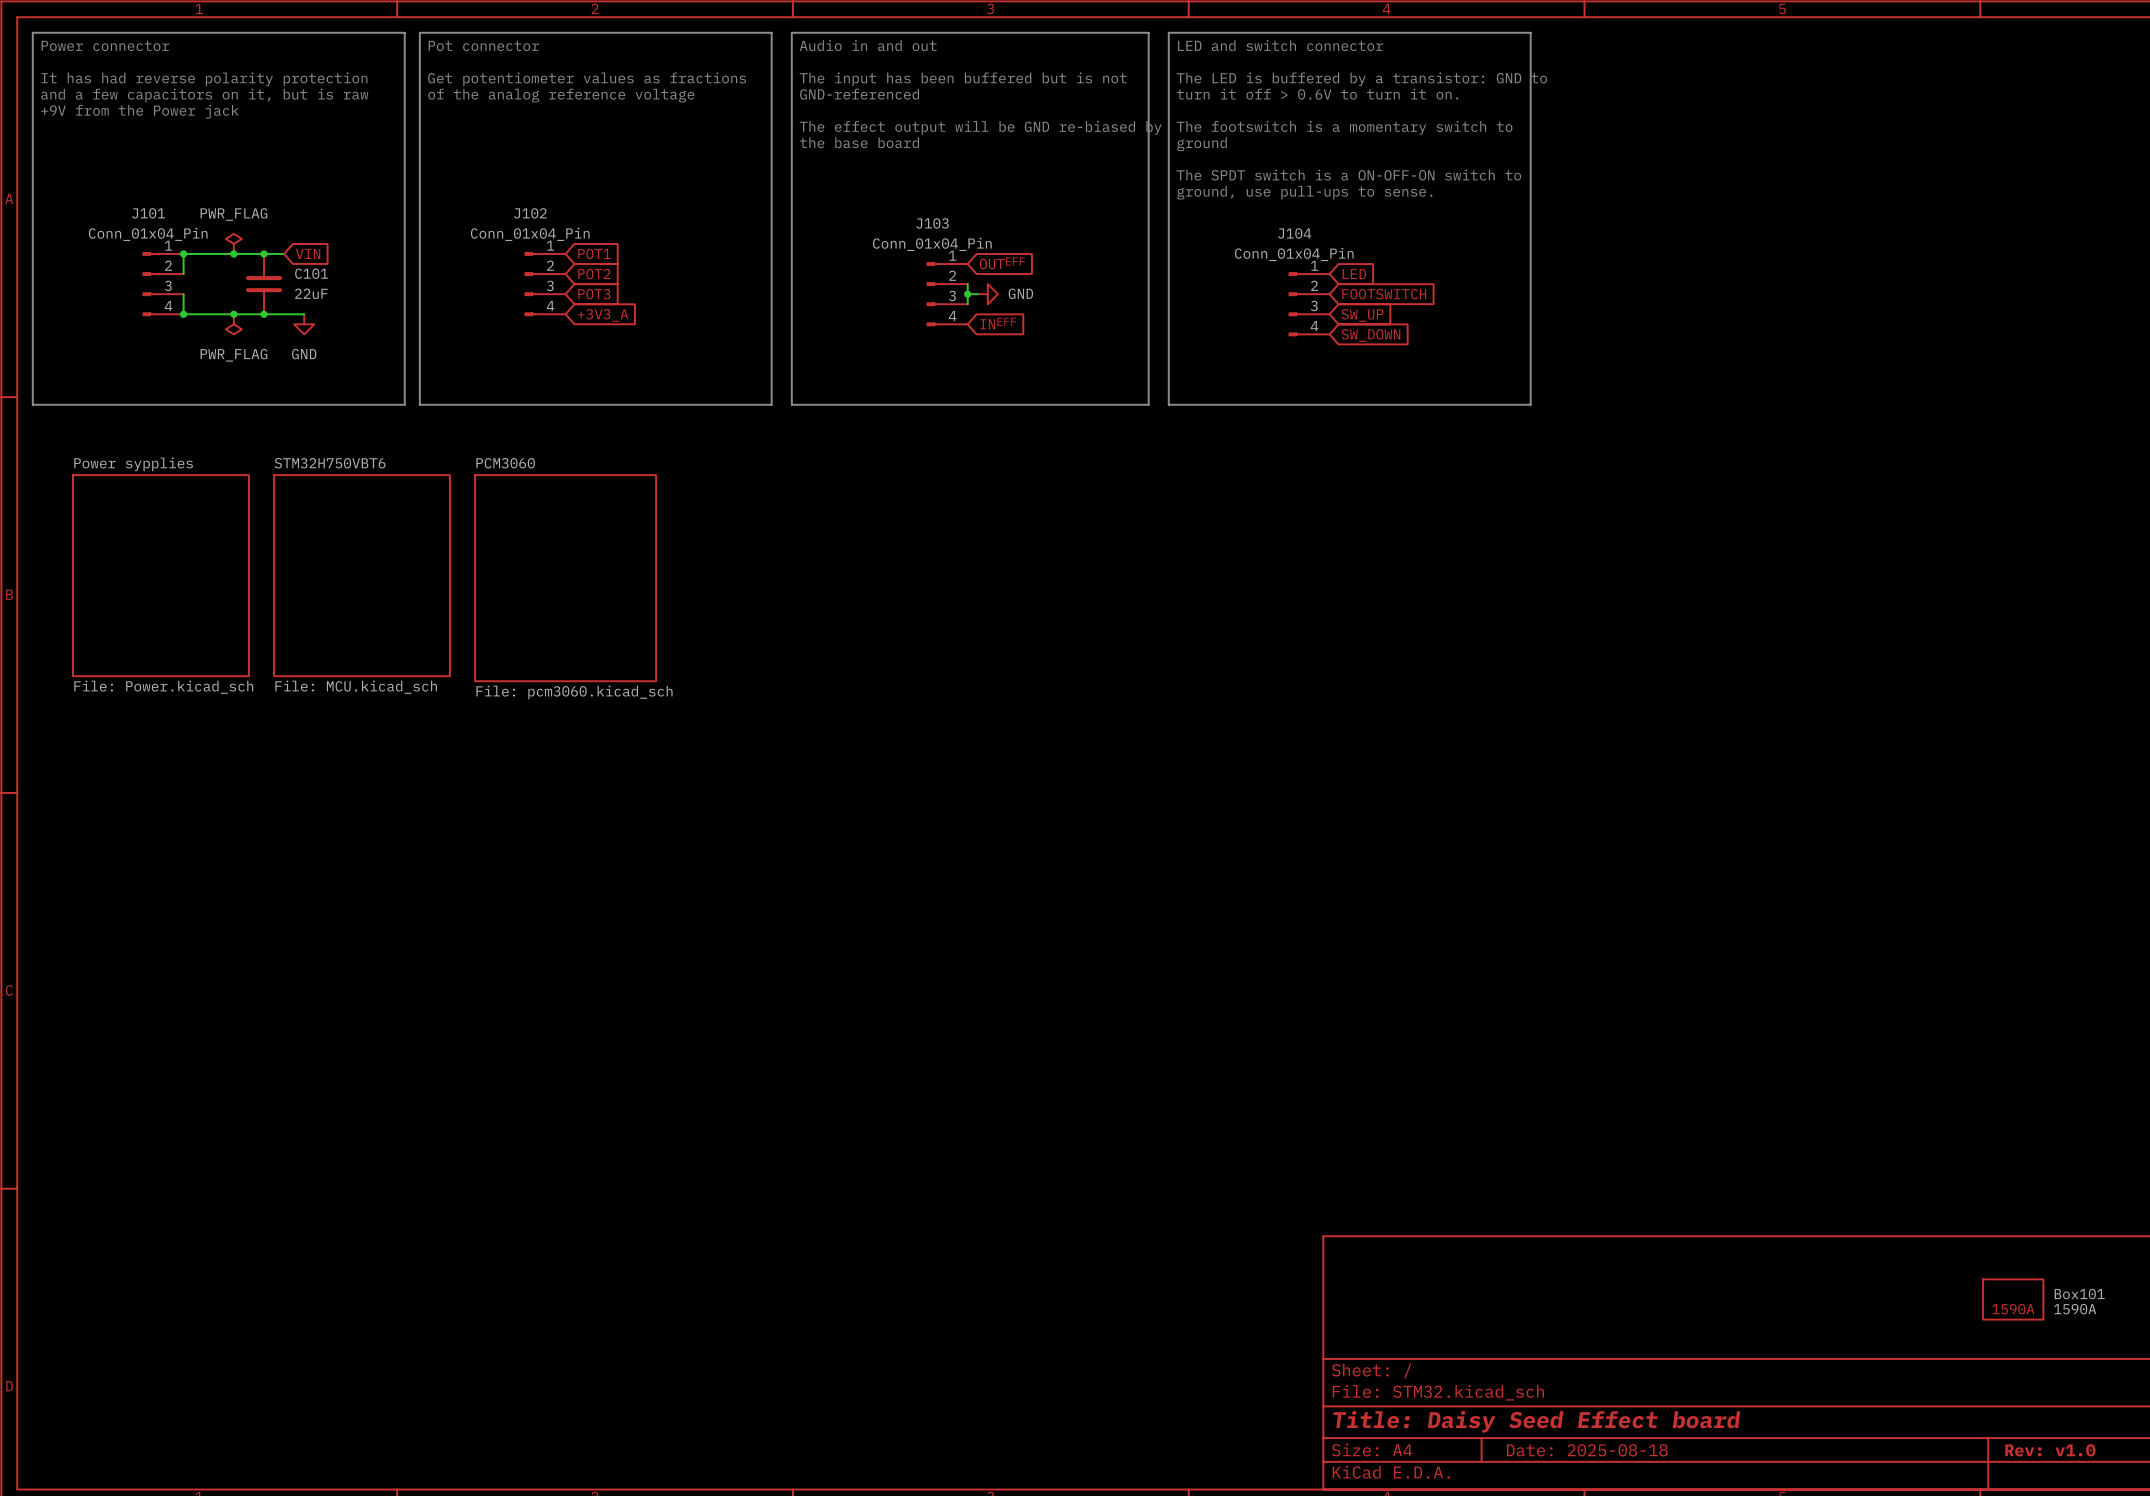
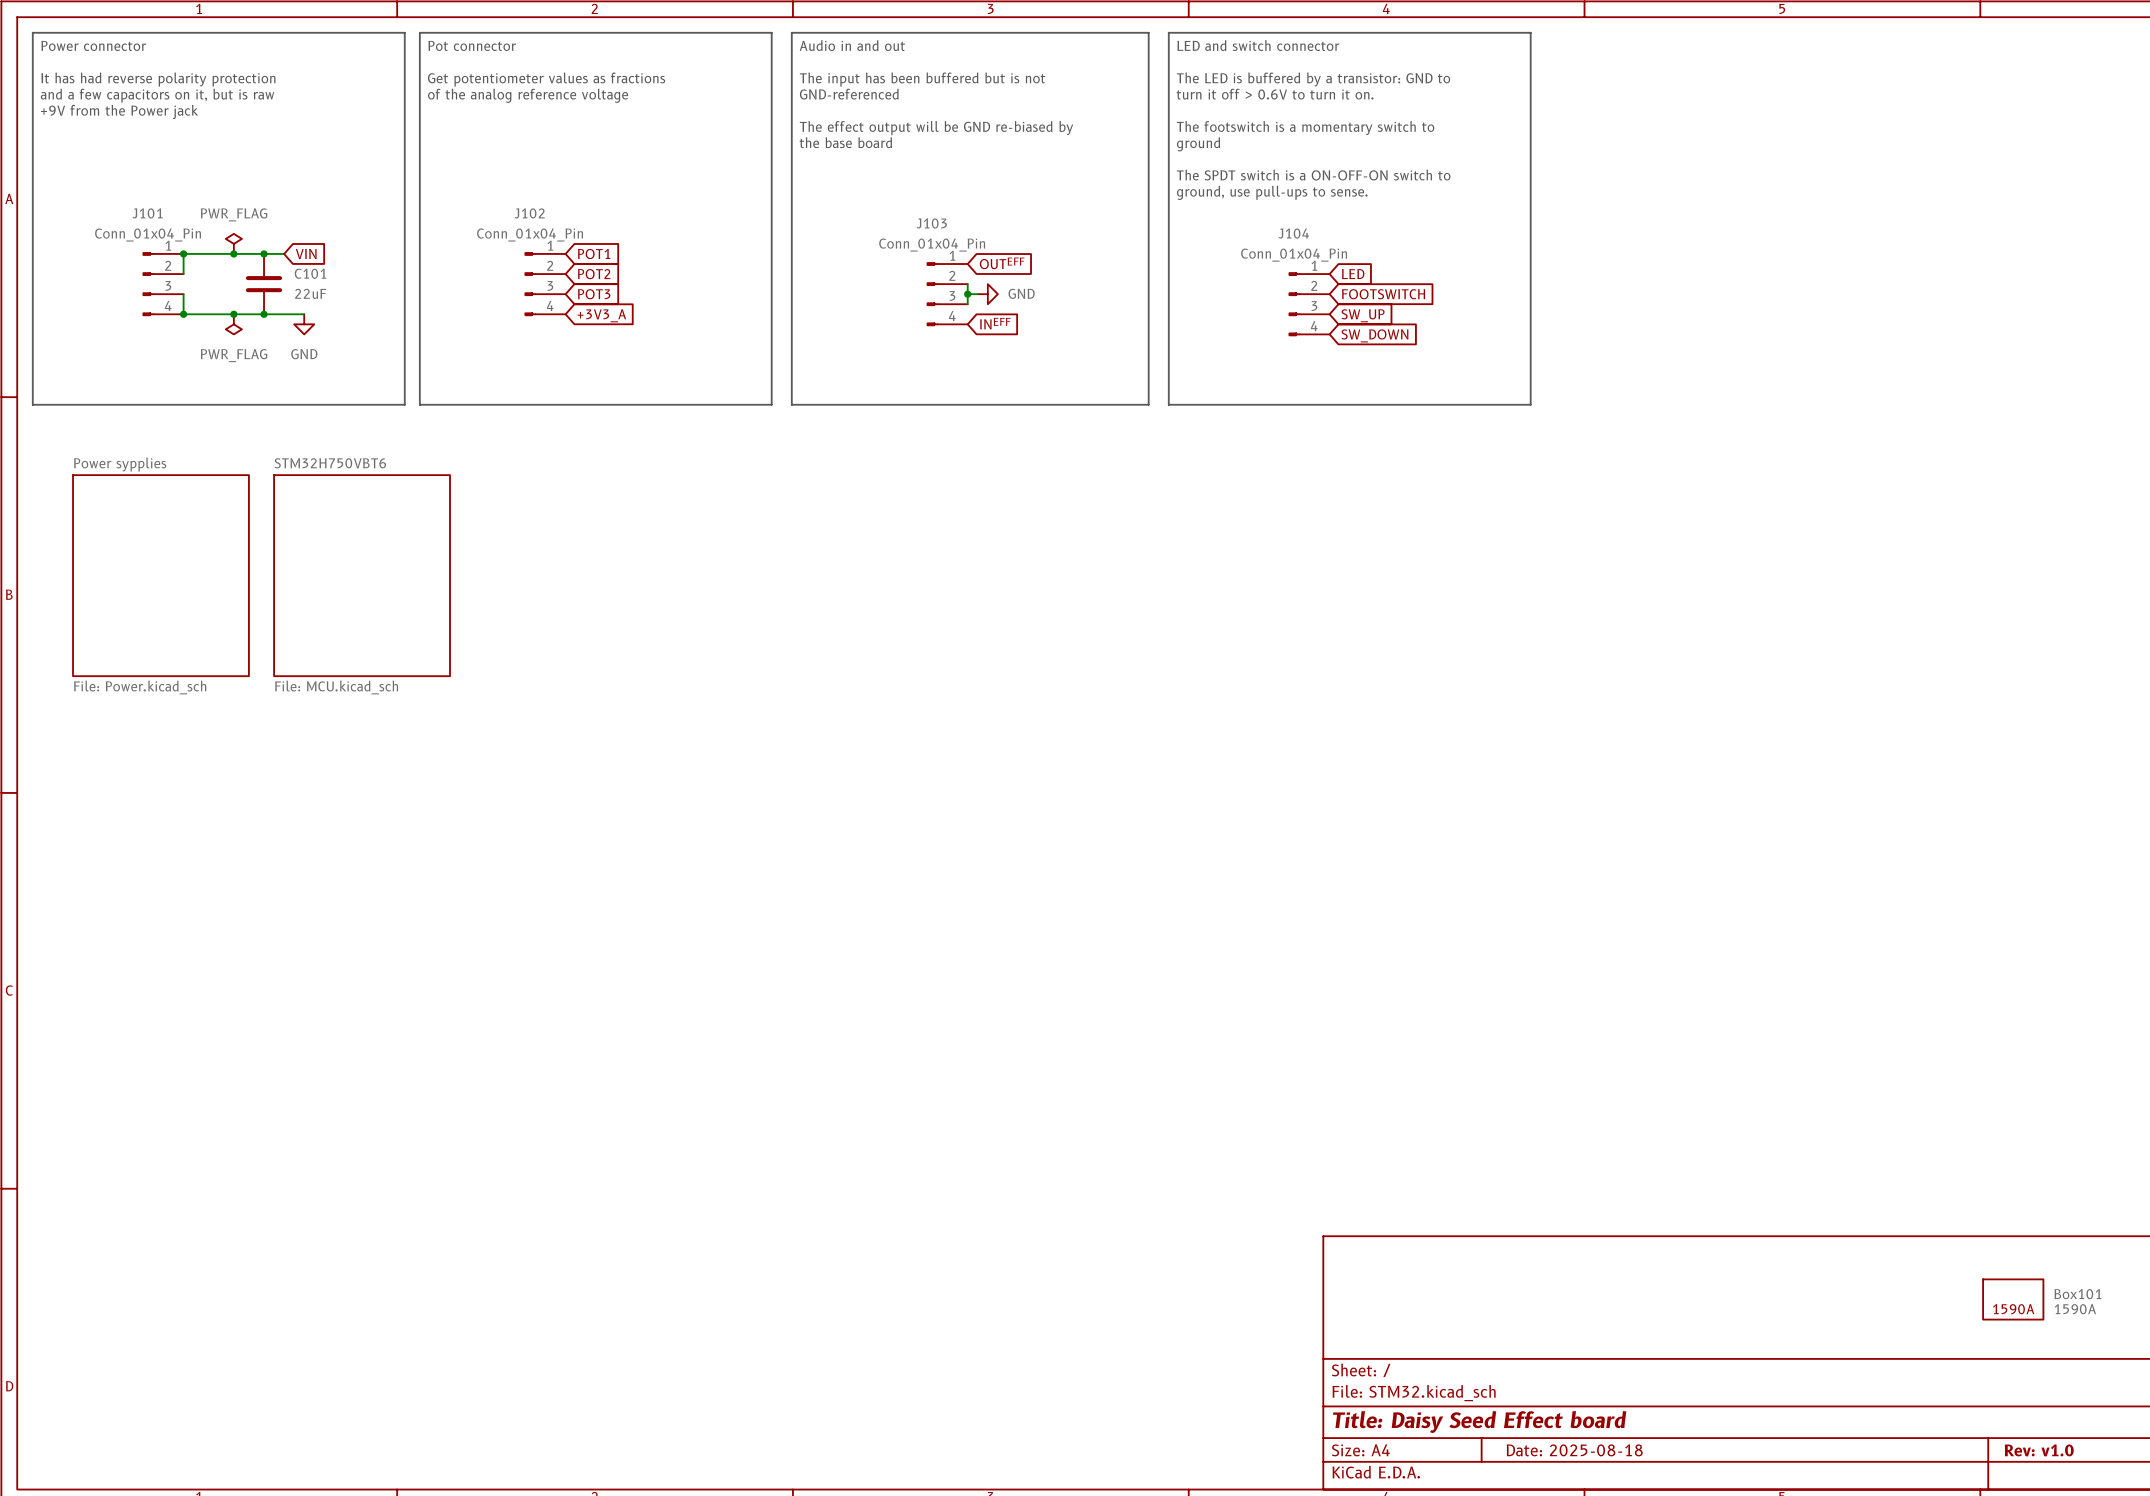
sheet PCM3060: File: pcm3060.kicad_sch (565, 578) -> none

